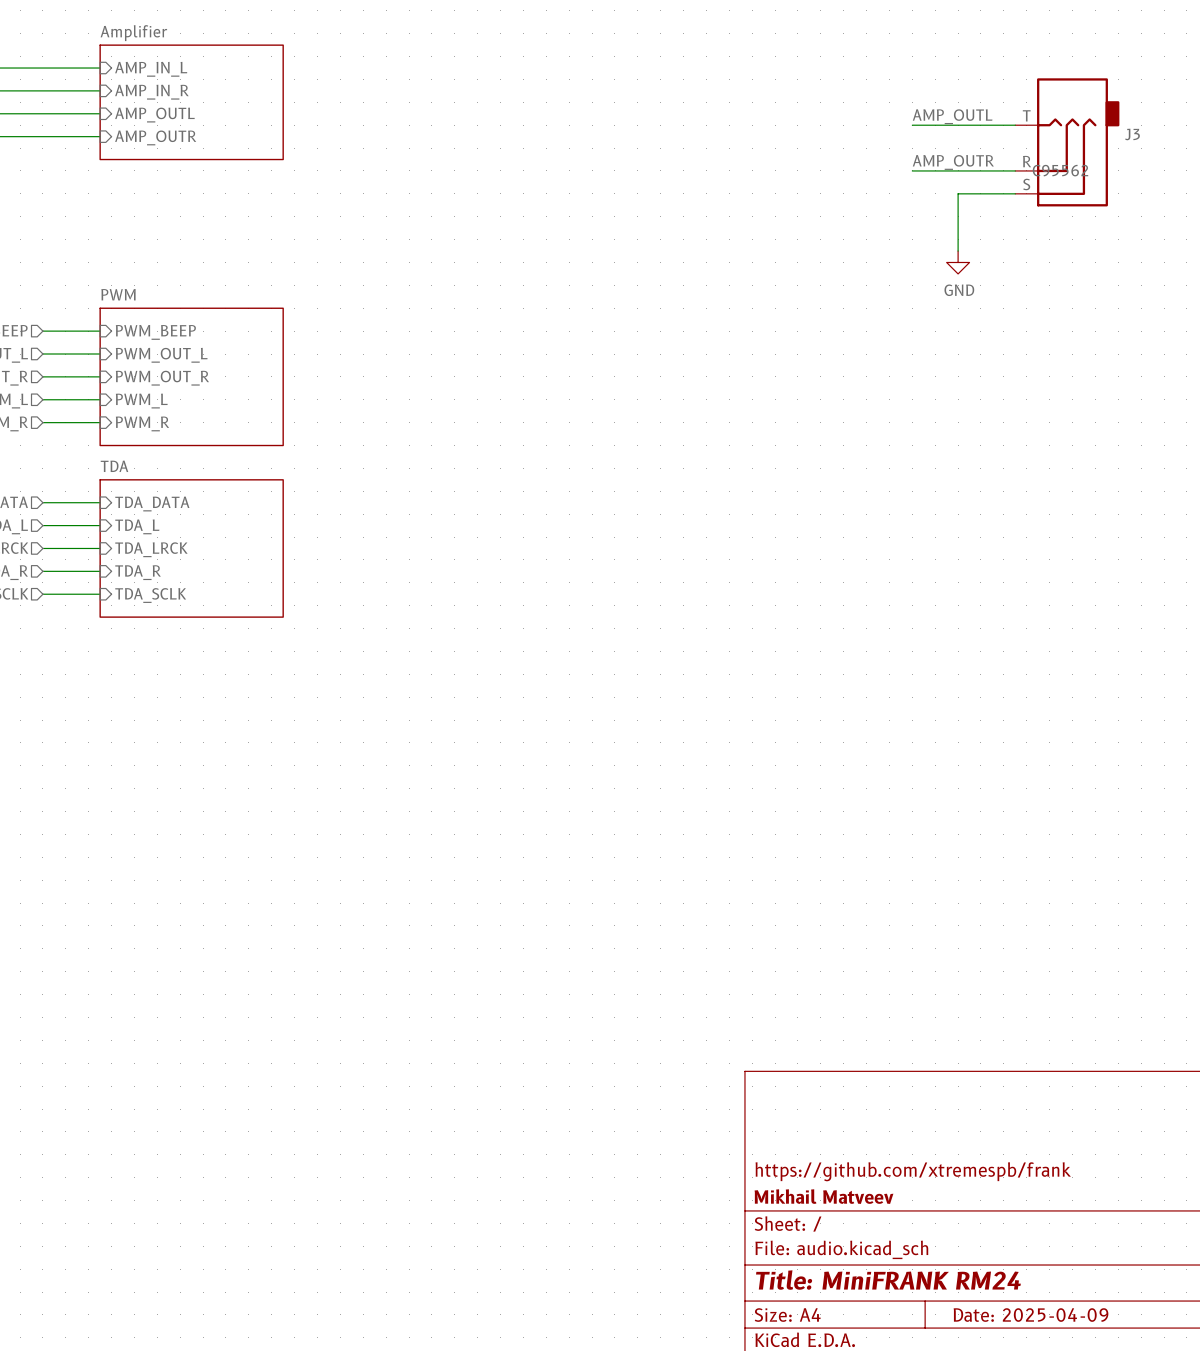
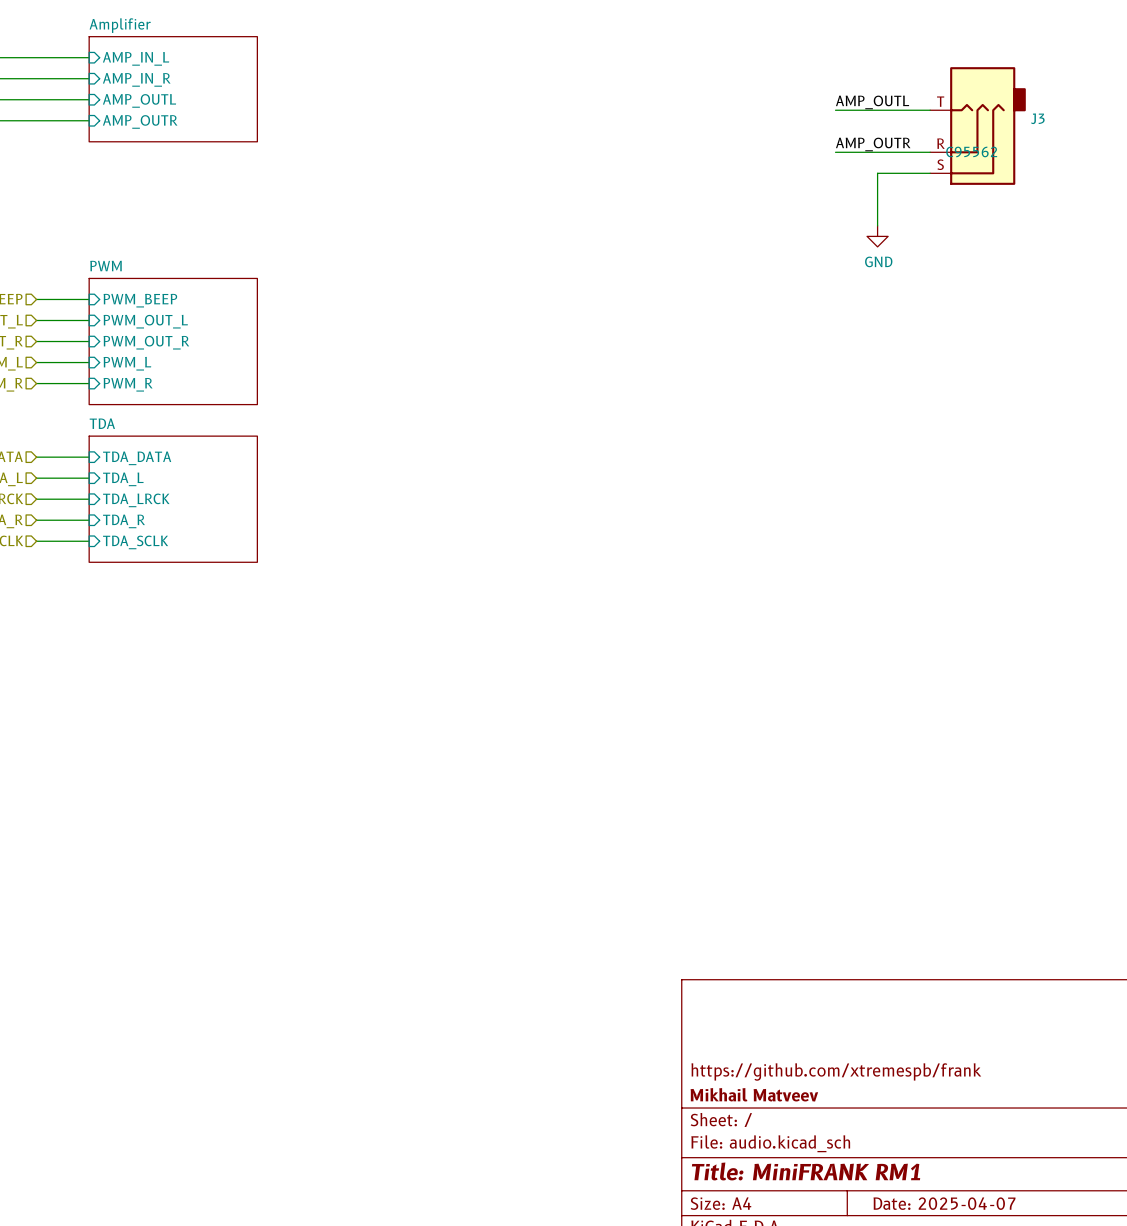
title block: Title: MiniFRANK RM24 (888, 1280) -> Title: MiniFRANK RM1 (806, 1171)
title block: Date: 2025-04-09 (1031, 1315) -> Date: 2025-04-07 (944, 1203)

